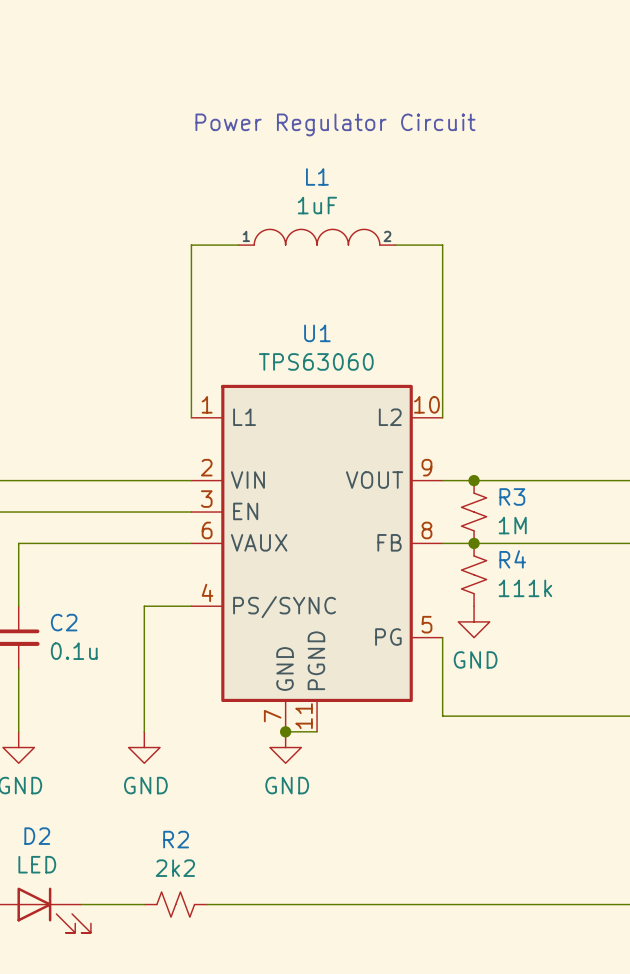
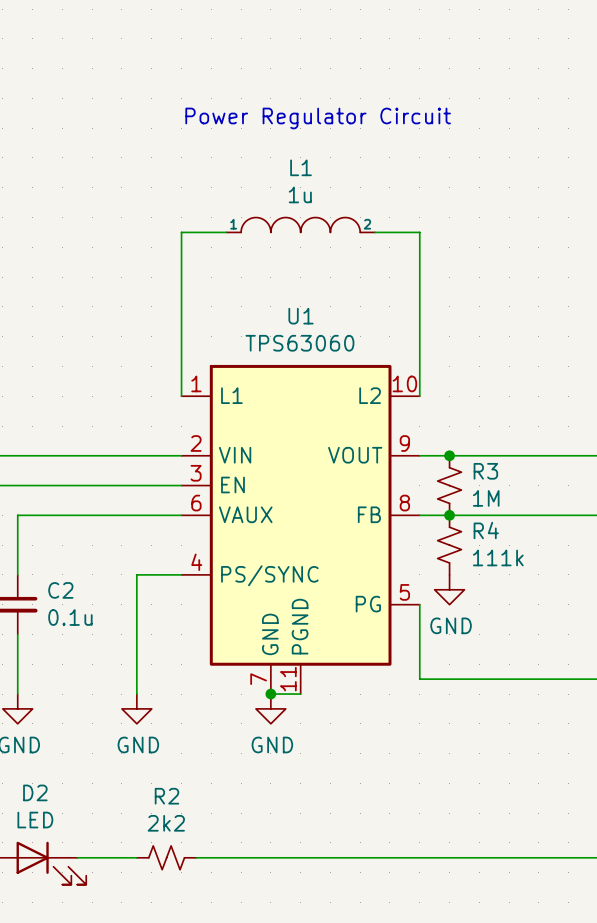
L1 value: 1uF (317, 205) -> 1u (300, 194)

